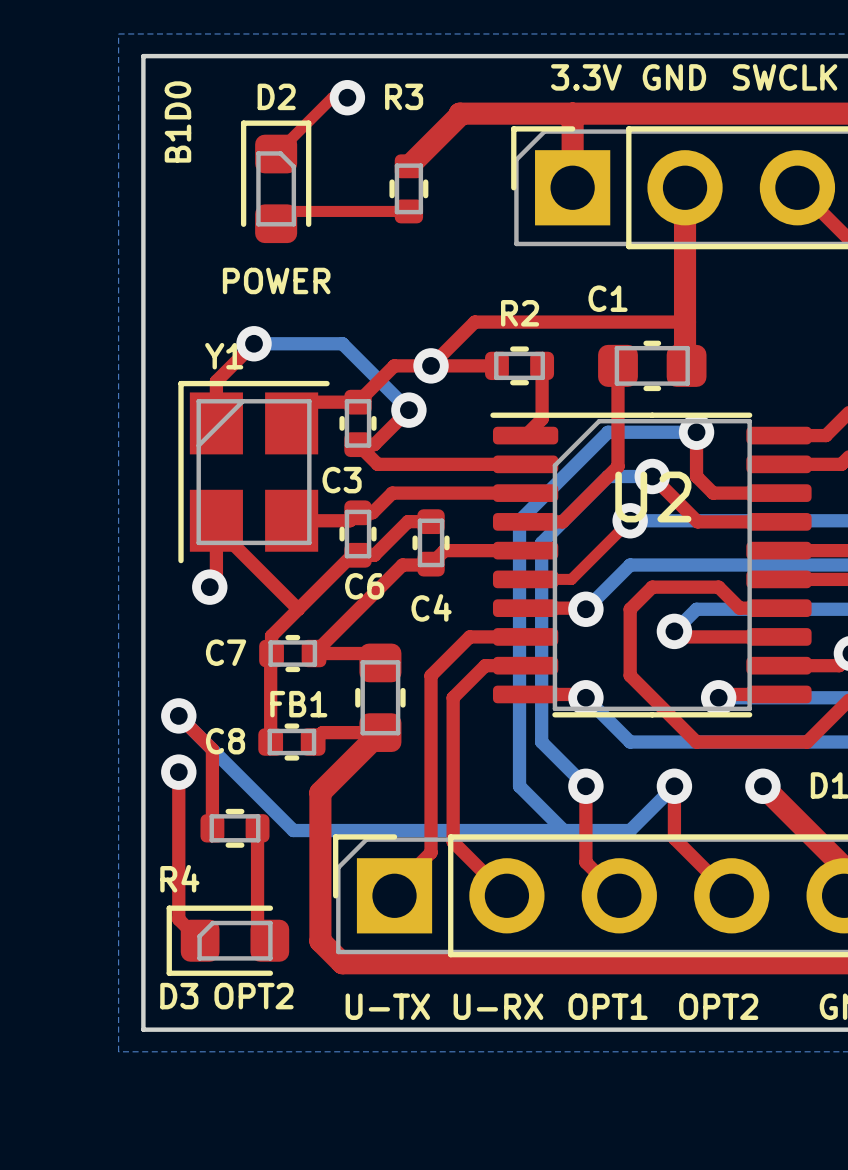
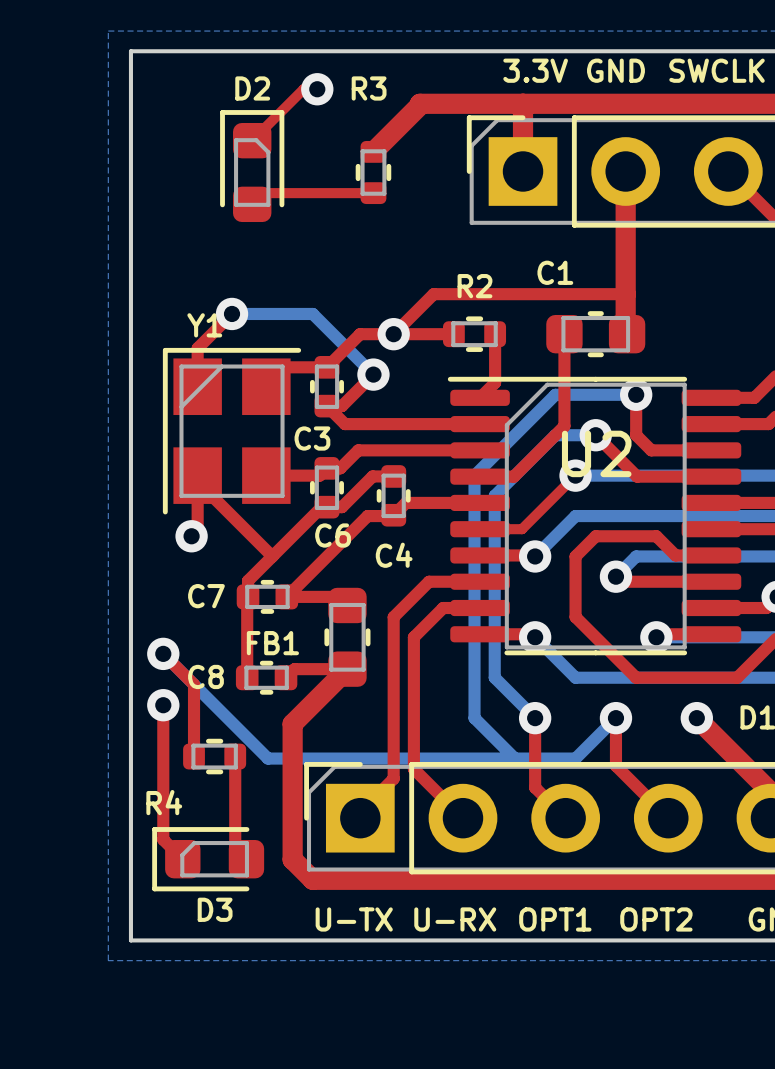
text: B1D0 (177, 121) -> none
text: POWER (276, 280) -> none
D3 name position: D3 (179, 996) -> D3 (215, 909)
text: OPT2 (254, 996) -> none

